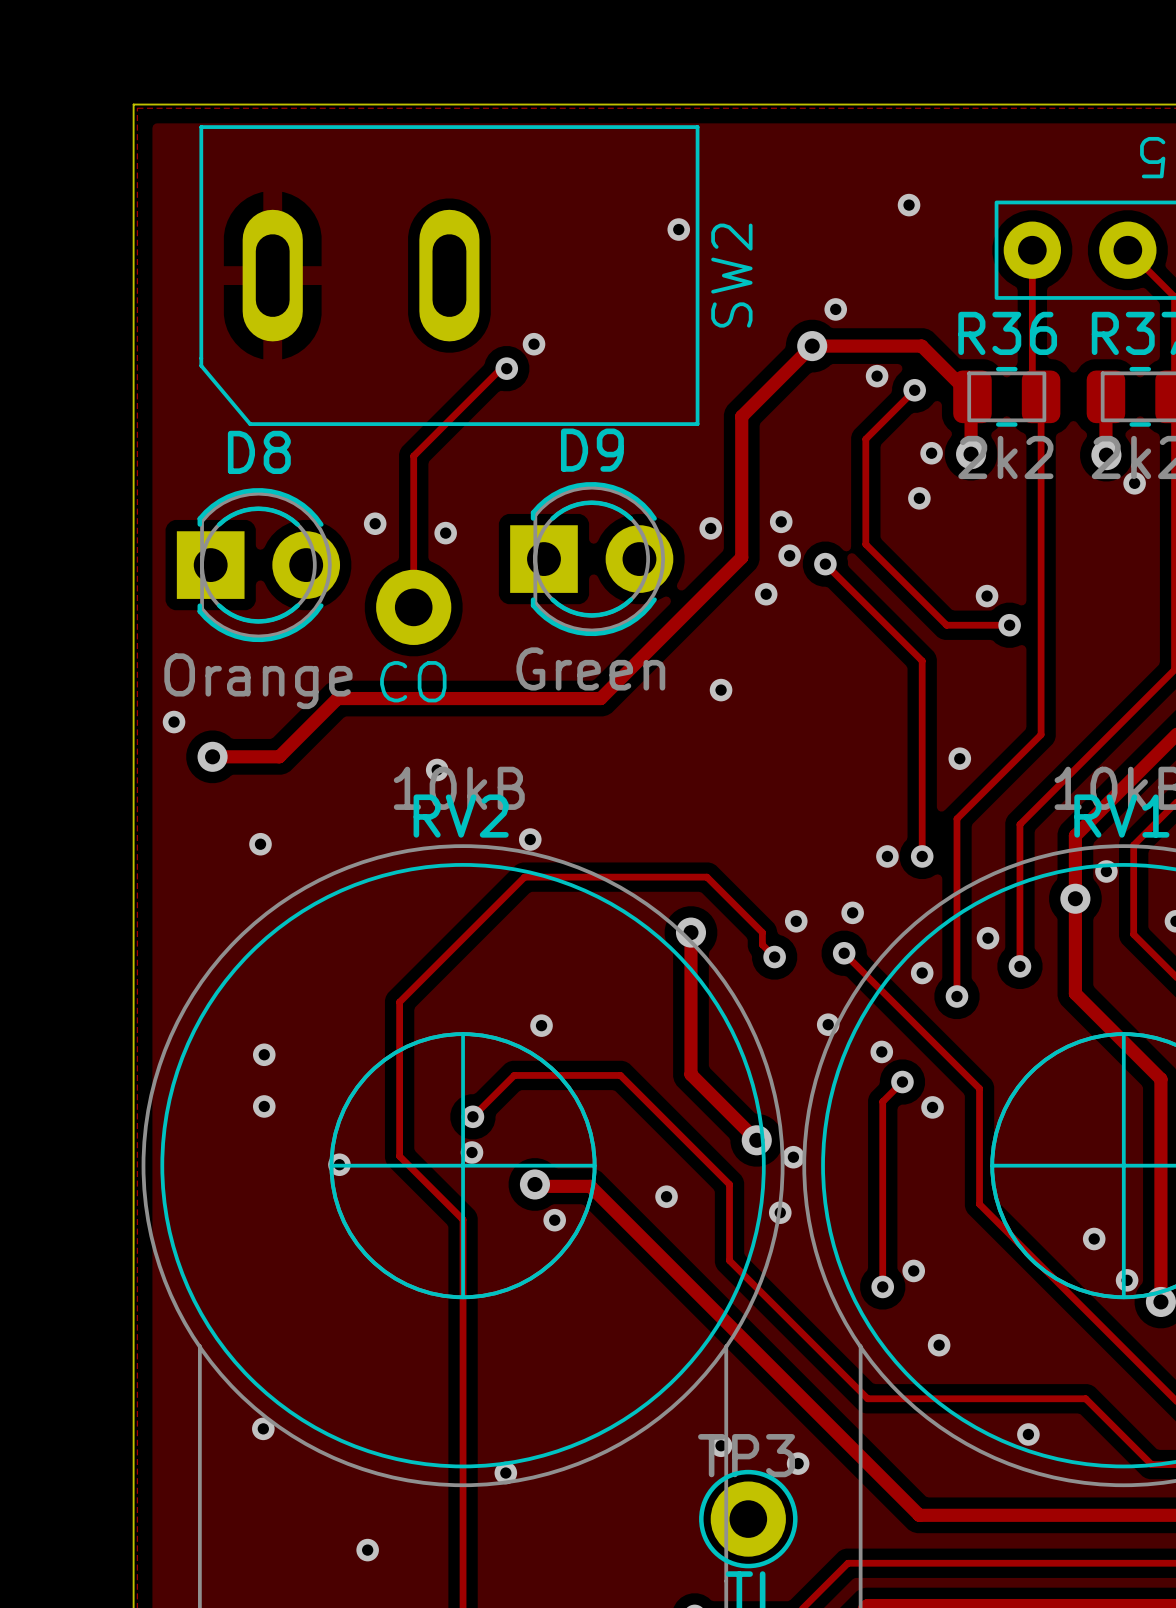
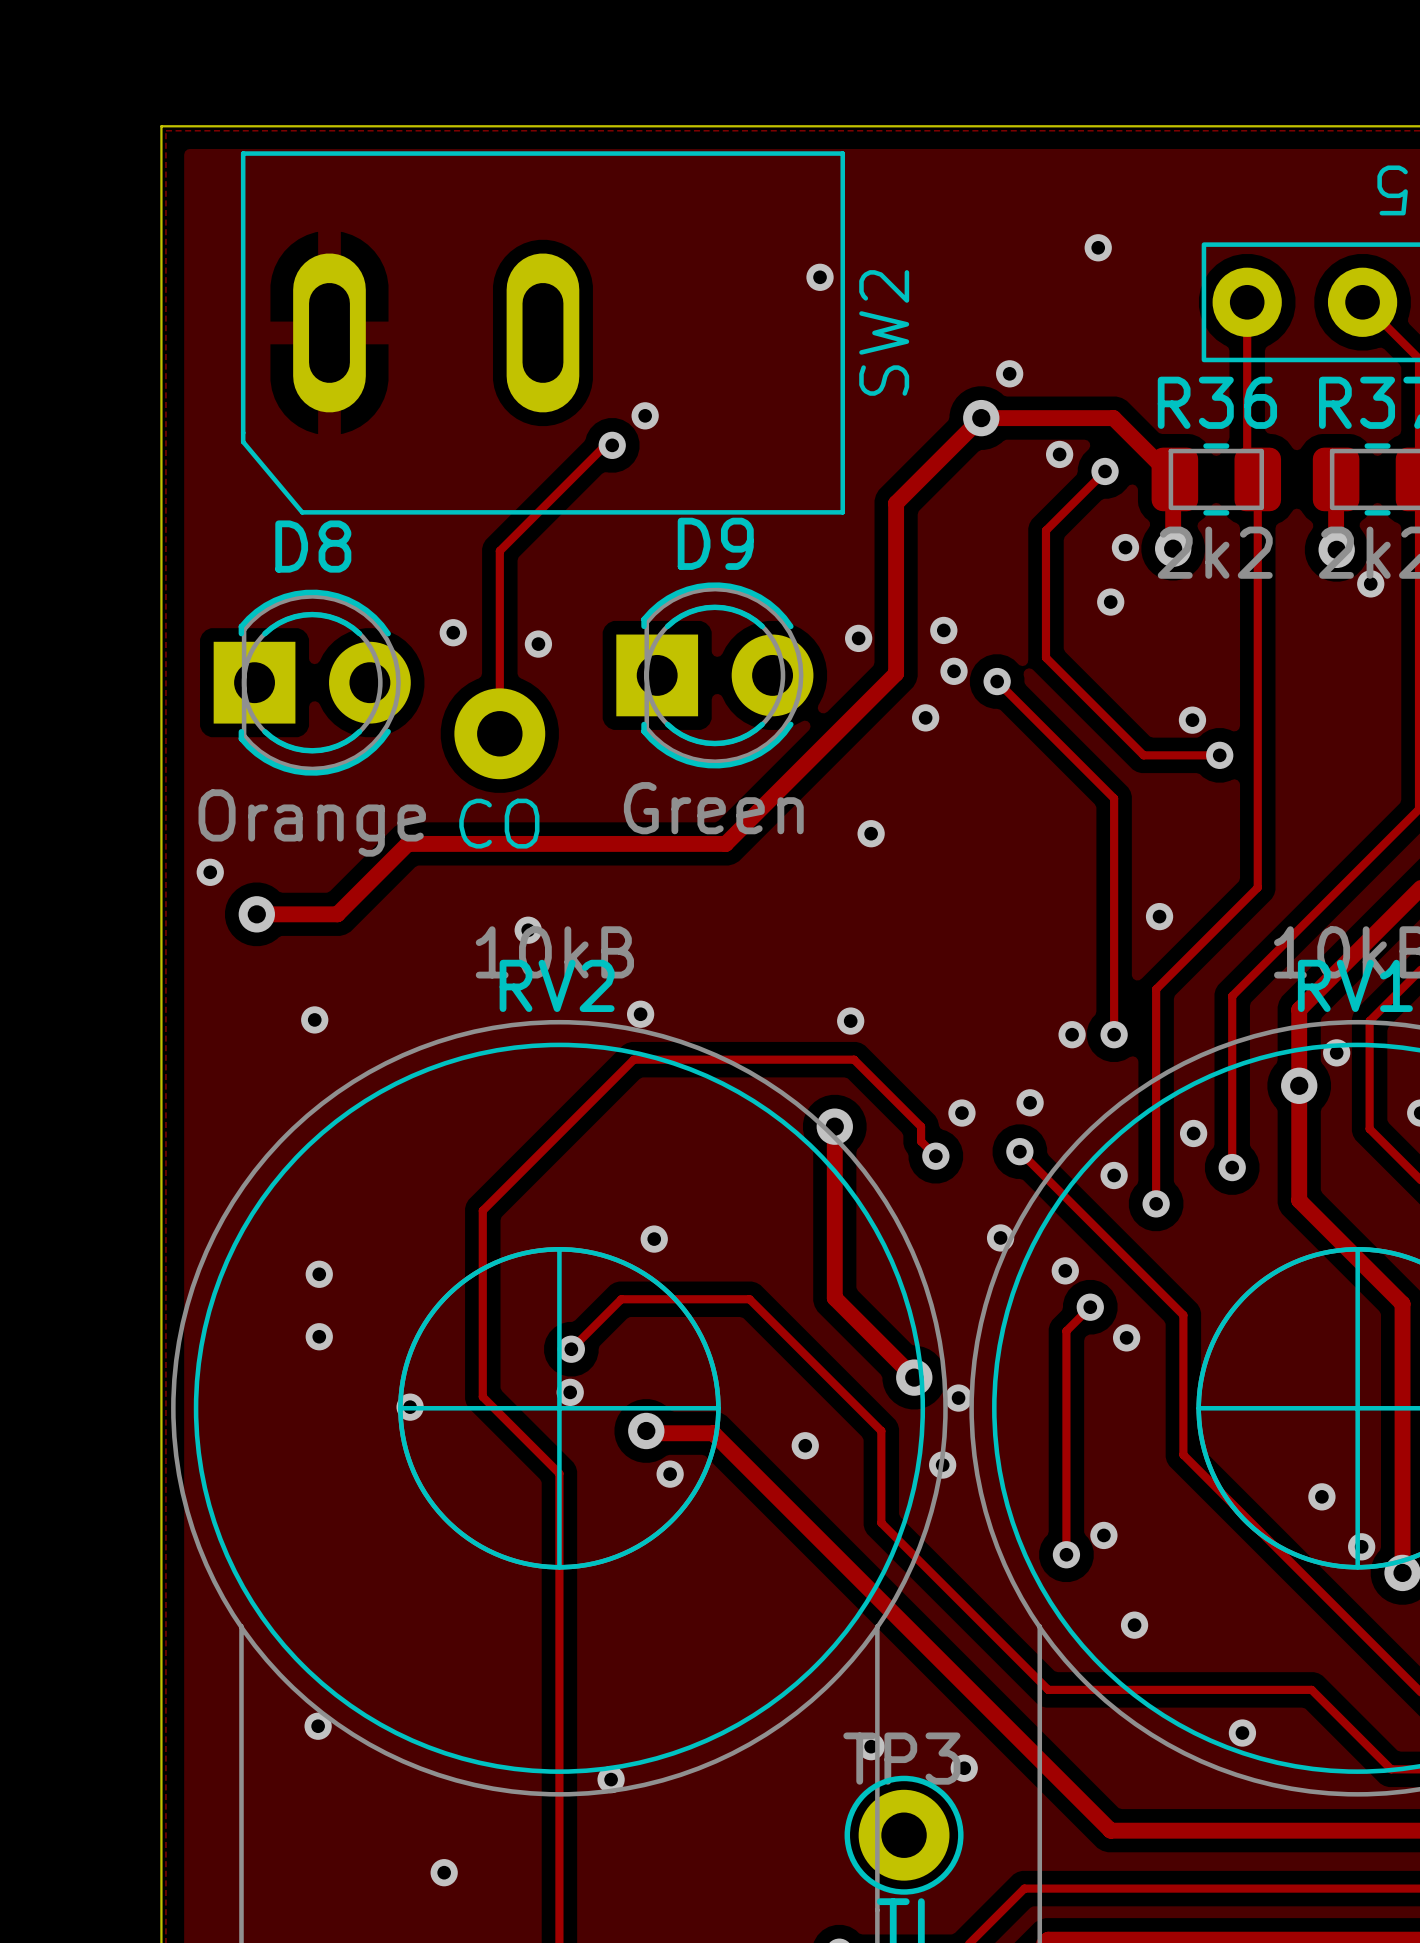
via: none -> (850, 1021)

